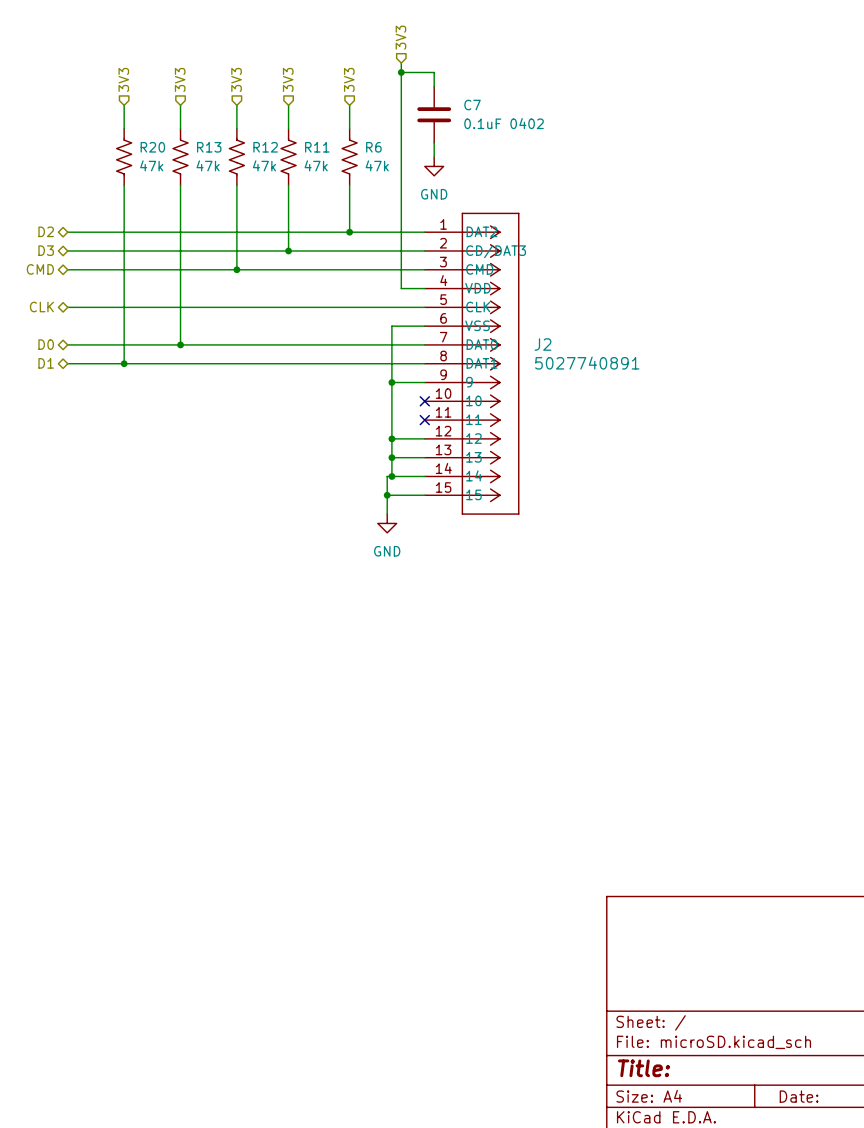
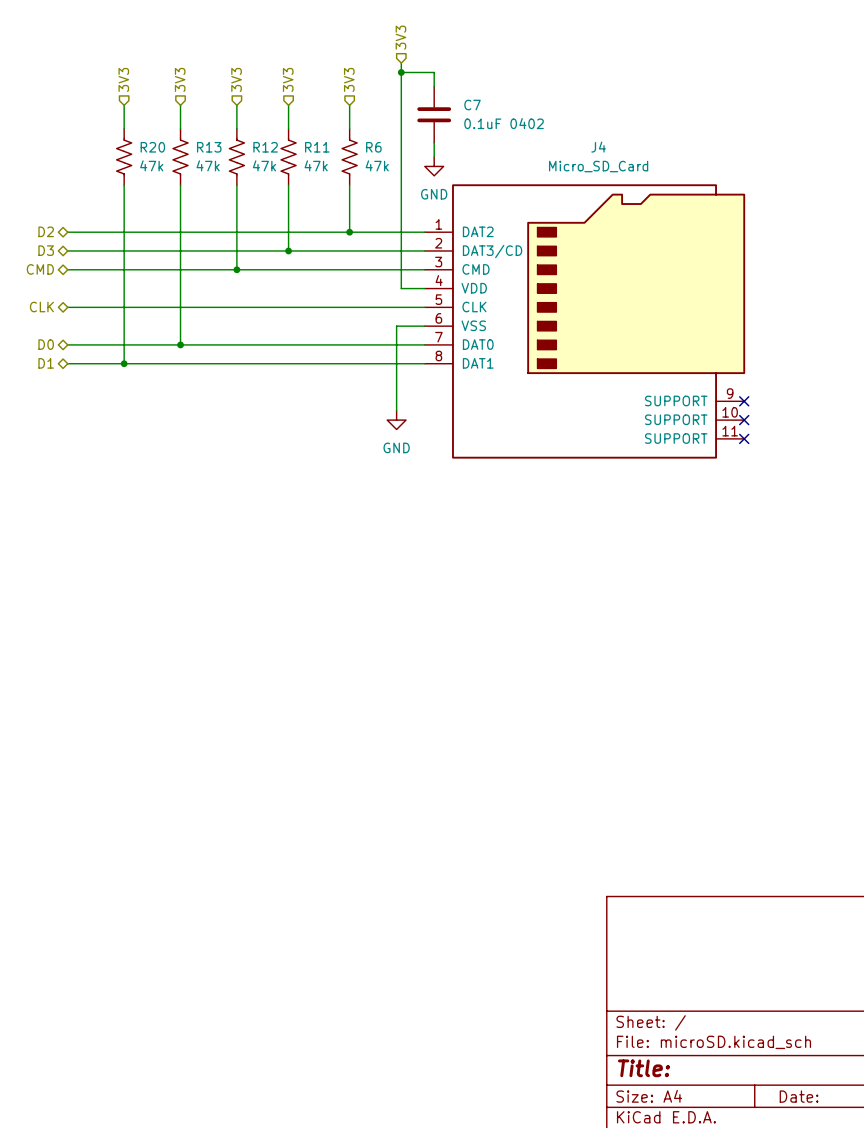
J4: none -> Micro_SD_Card (584, 321)
wire: (396, 326) (391, 326) (391, 476) -> (396, 326) (396, 410)
J2: 5027740891 (472, 363) -> none
wire: (391, 382) (424, 382) -> none
junction: (391, 382) -> none
no-connect mark: (424, 401) -> none
no-connect mark: none -> (744, 401)
no-connect mark: (424, 420) -> none
no-connect mark: none -> (744, 420)
wire: (391, 438) (424, 438) -> none
junction: (391, 438) -> none
no-connect mark: none -> (744, 438)
wire: (391, 457) (424, 457) -> none
junction: (391, 457) -> none
junction: (391, 476) -> none
wire: (424, 476) (387, 476) (387, 514) -> none
wire: (387, 495) (424, 495) -> none
junction: (387, 495) -> none
power symbol position: GND (387, 523) -> GND (396, 420)

